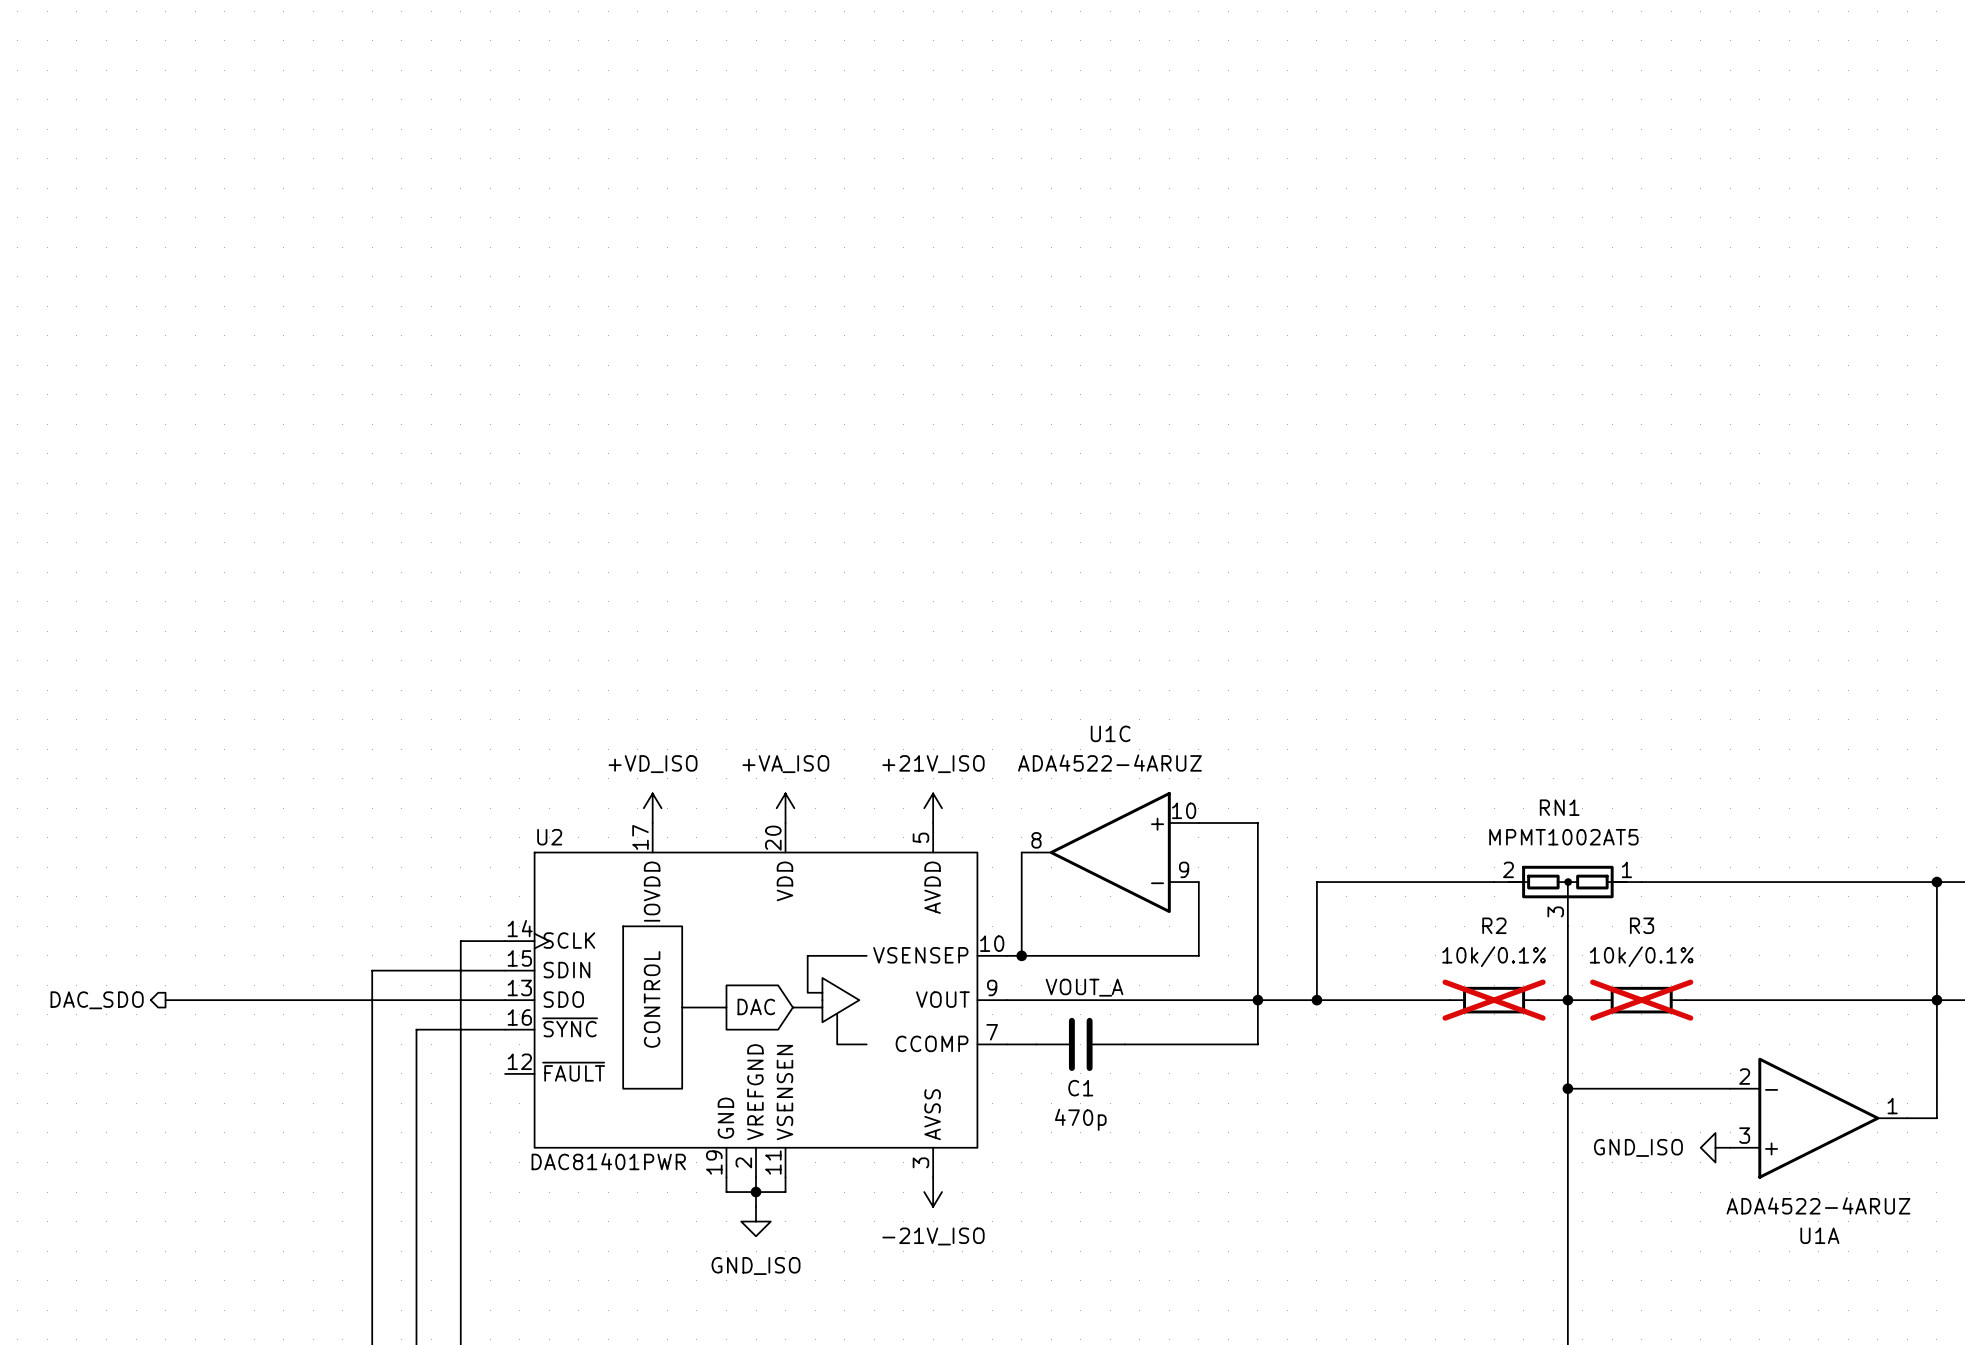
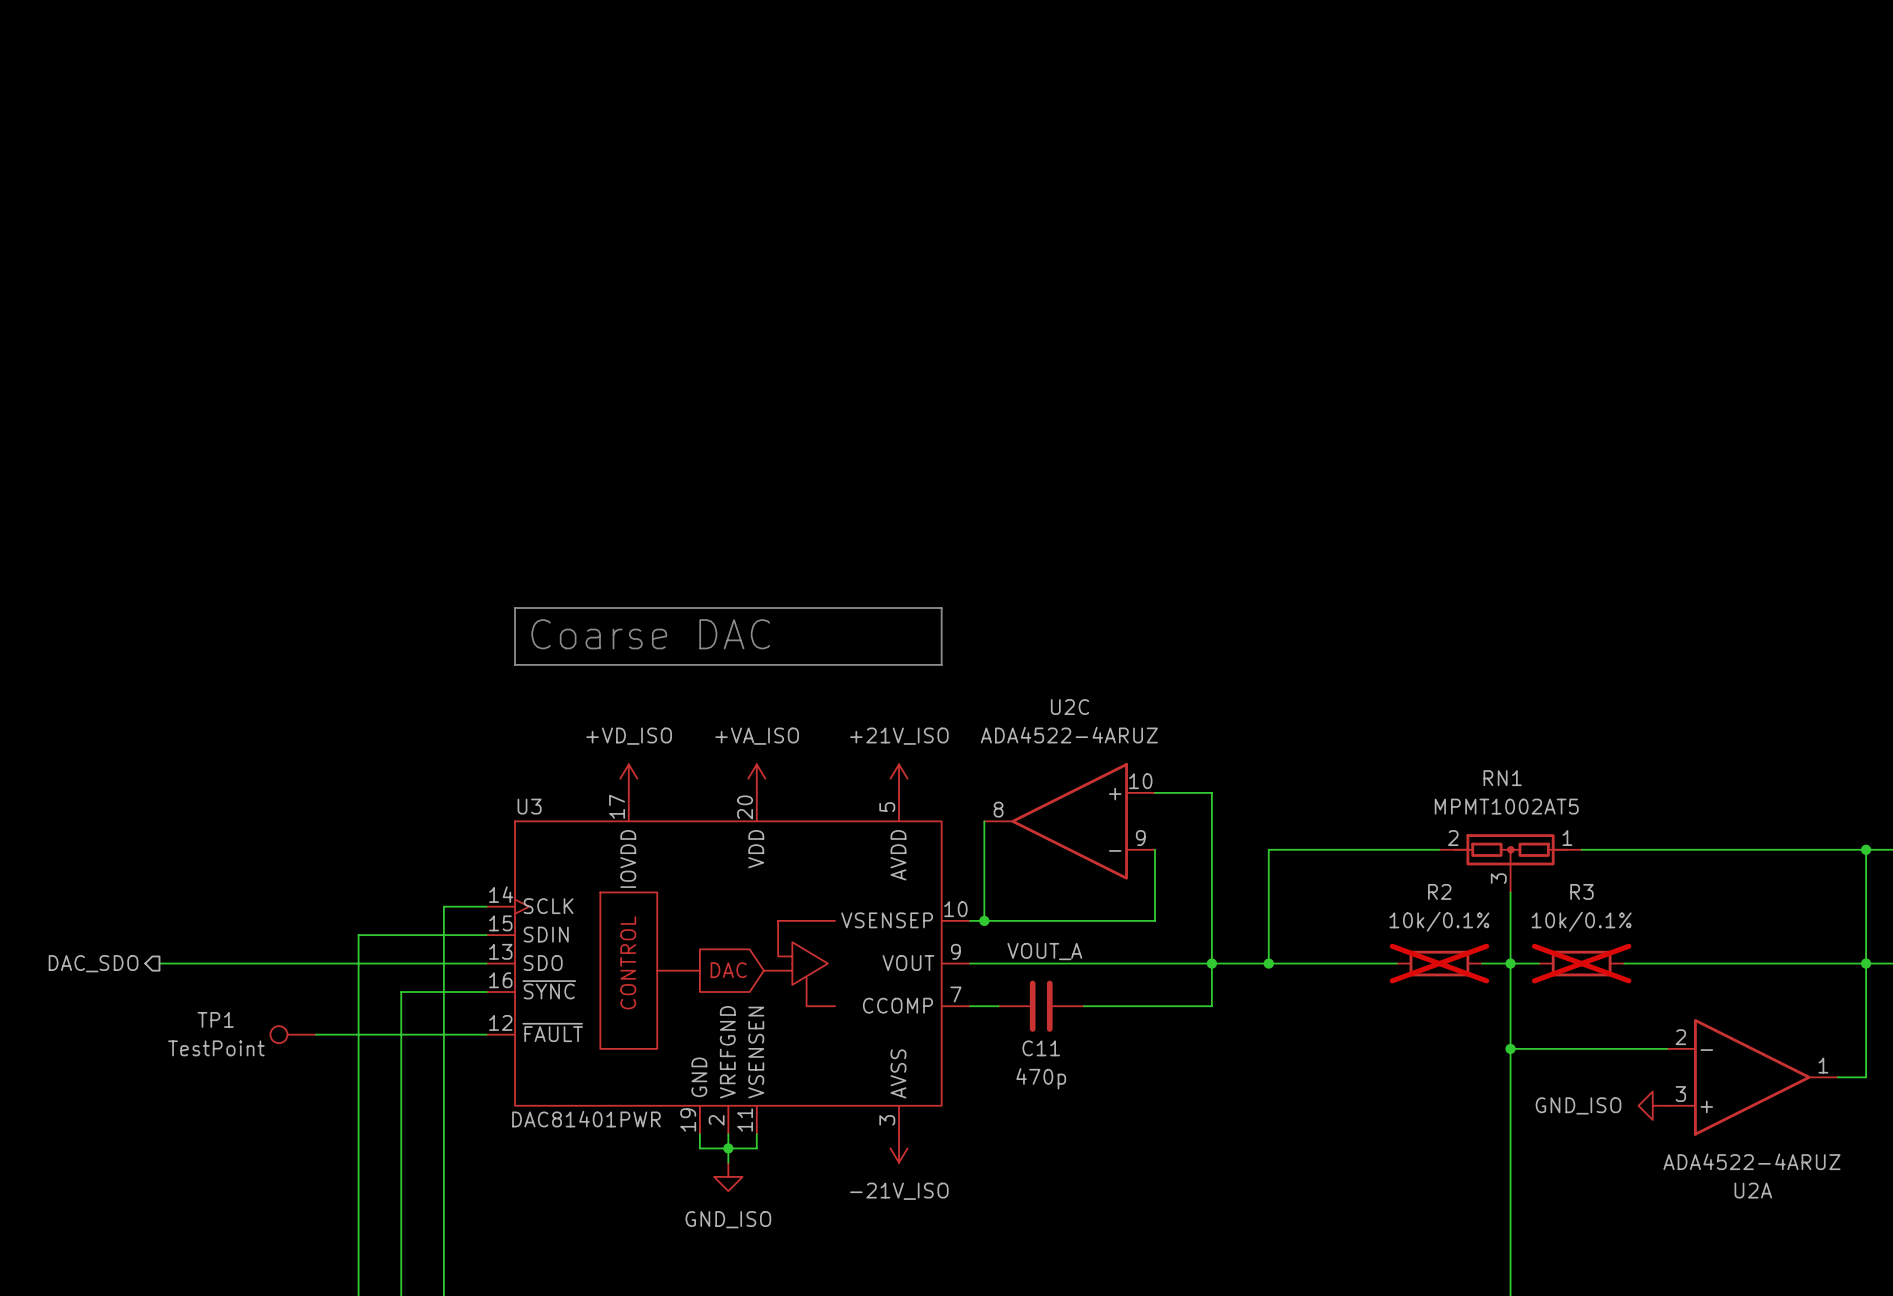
line: none -> (515, 608) (941, 608) (941, 664) (515, 664) (515, 608)
text: none -> Coarse DAC (650, 634)
U1C name: U1C (1110, 733) -> U2C (1070, 707)
U2 name: U2 (549, 837) -> U3 (529, 806)
TP1: none -> TestPoint (293, 1034)
wire: none -> (315, 1034) (486, 1034)
C1 name: C1 (1080, 1088) -> C11 (1041, 1048)
U1A name: U1A (1819, 1235) -> U2A (1753, 1190)

